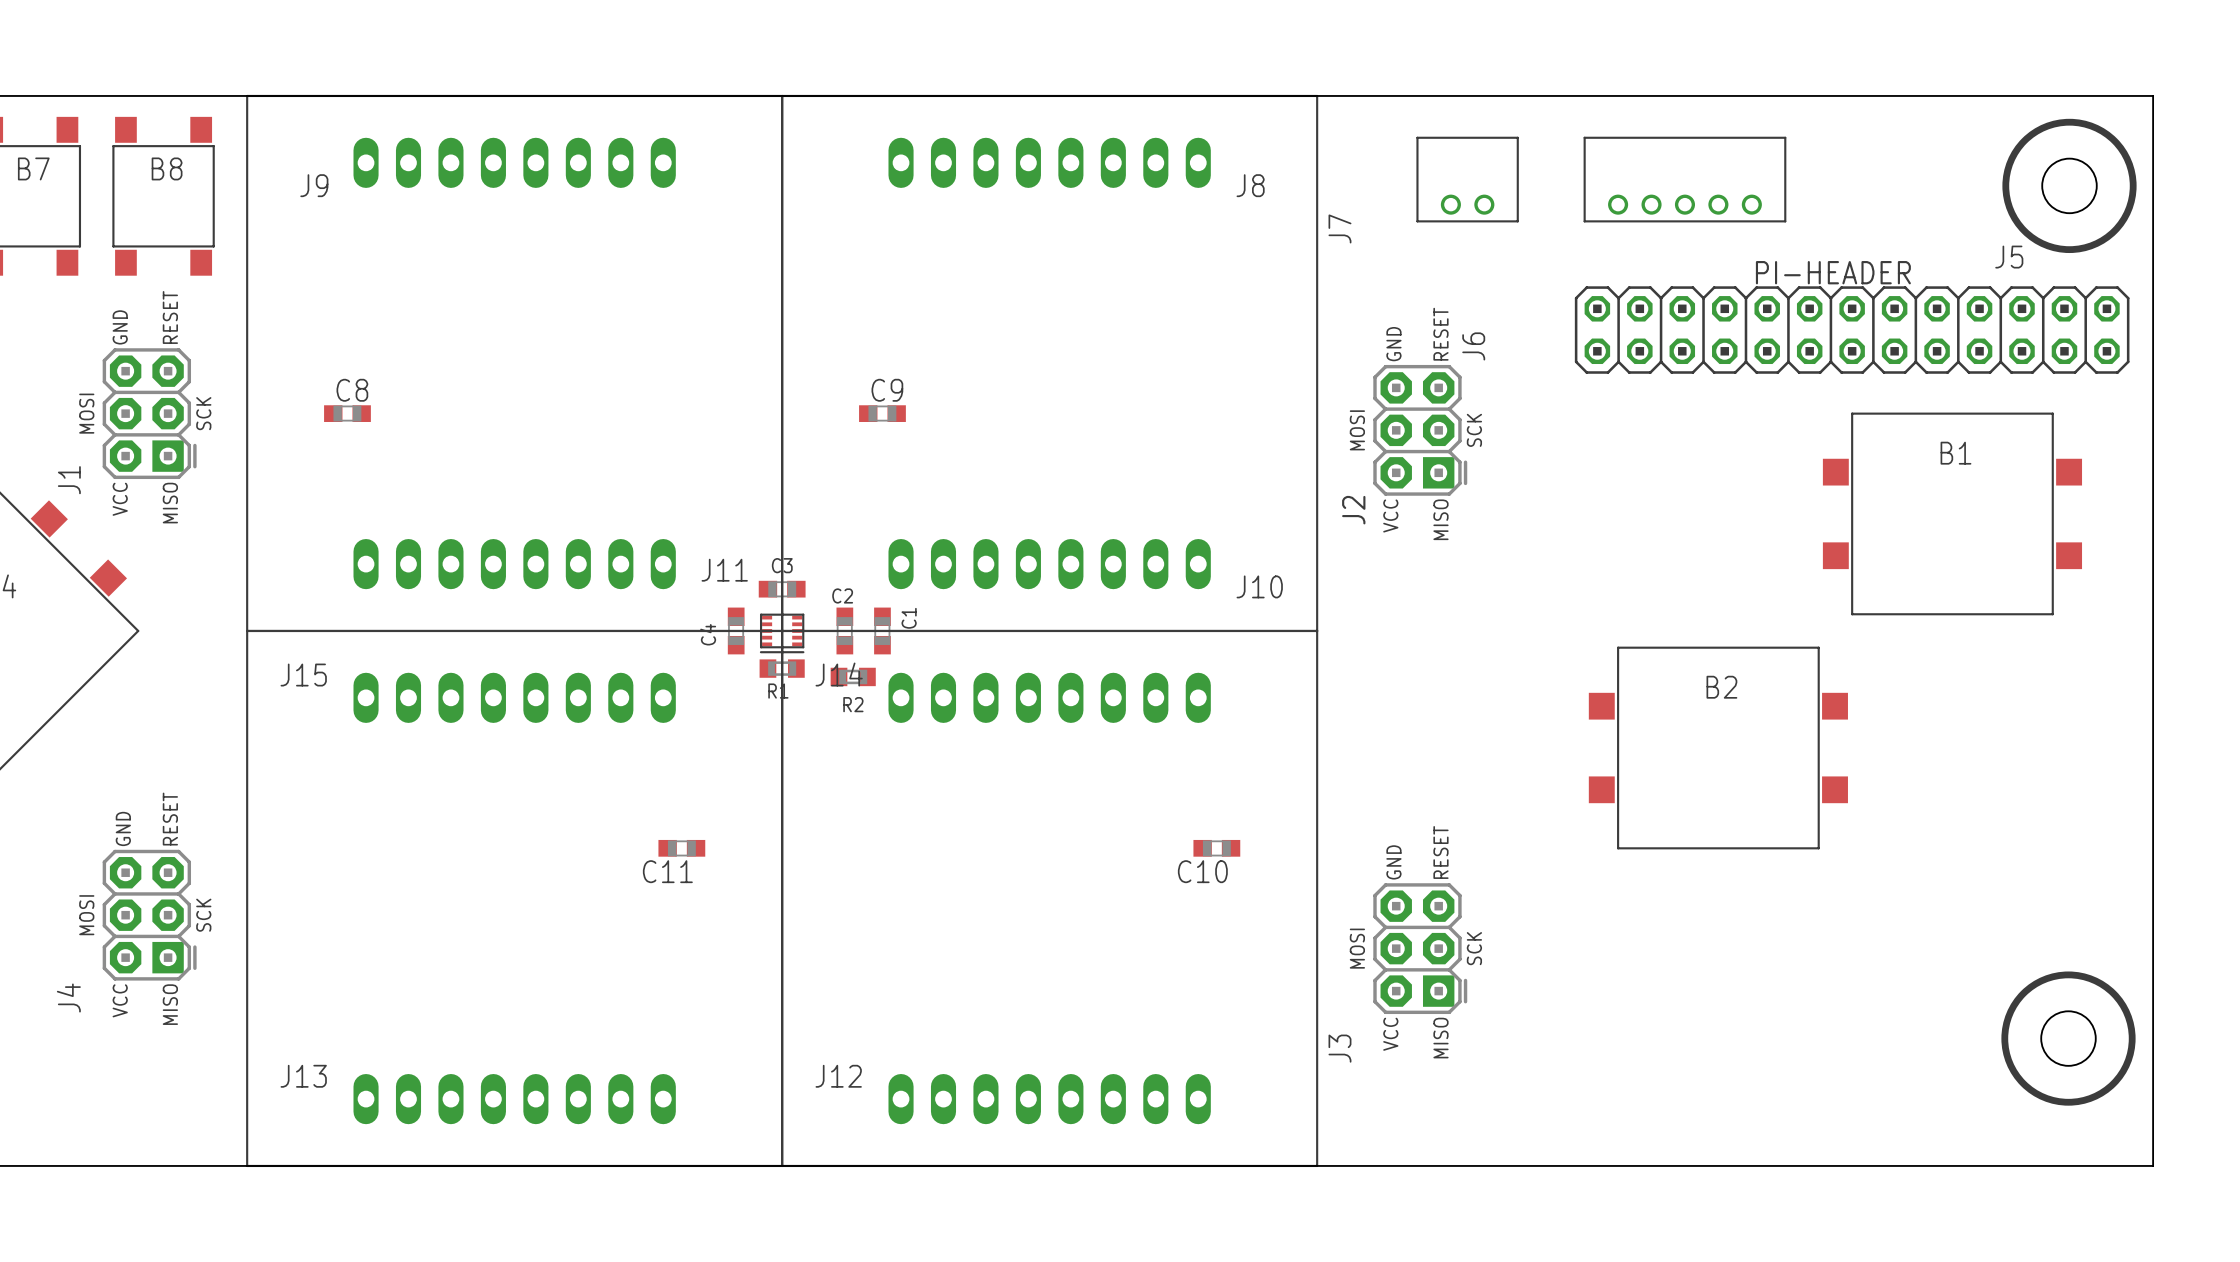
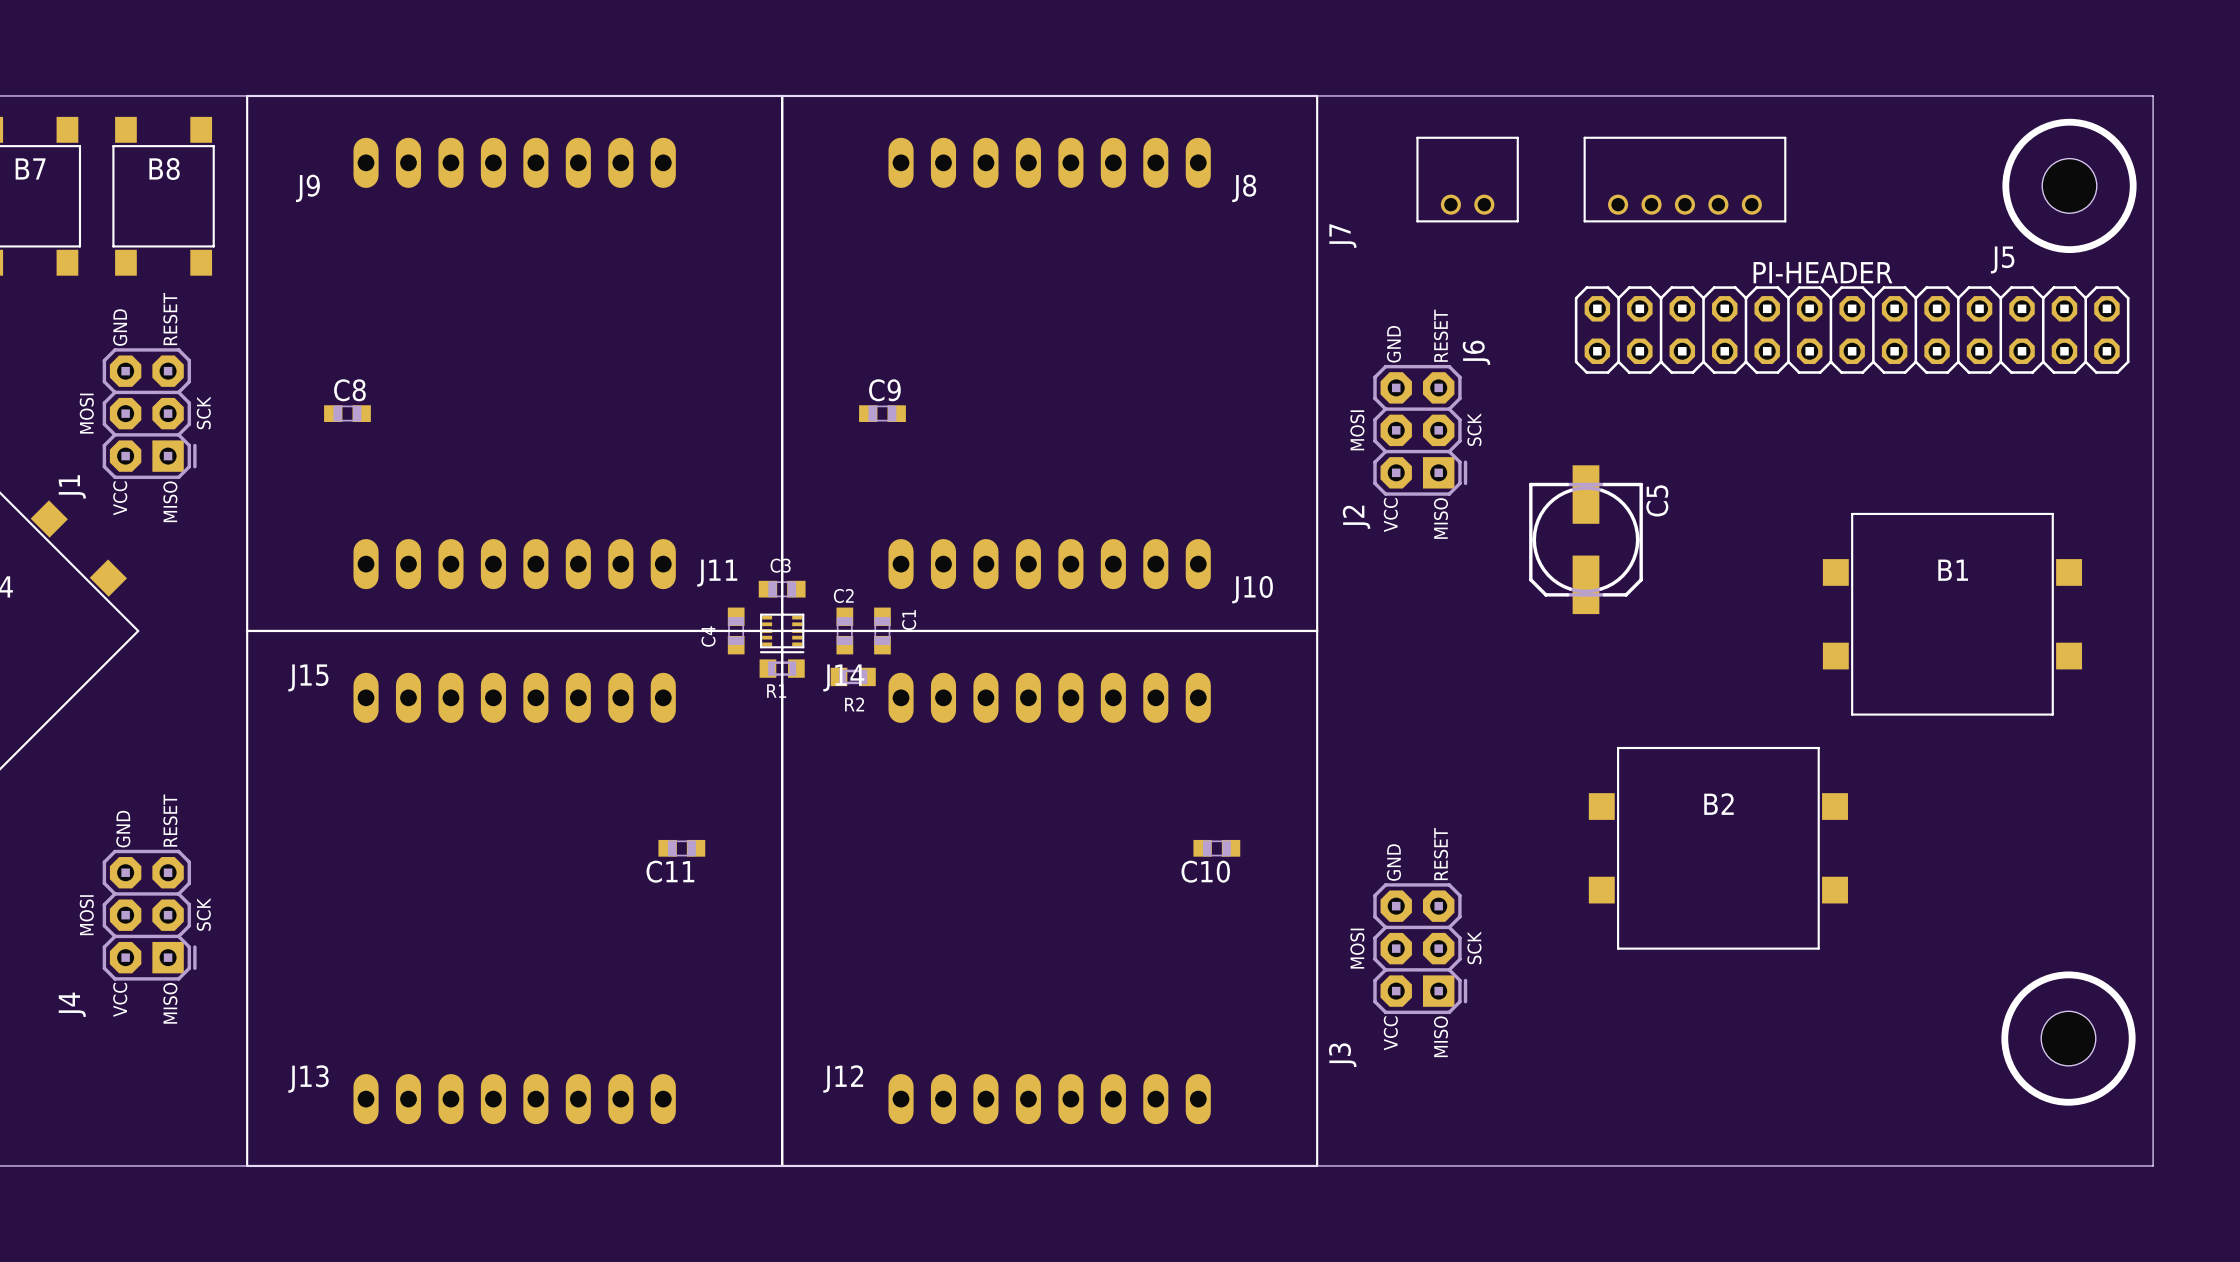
text position: B1 (1955, 453) -> B1 (1953, 570)
part position: (1952, 513) -> (1952, 614)
C5: none -> (1585, 539)
text position: B2 (1721, 687) -> B2 (1718, 804)
part position: (1718, 748) -> (1718, 848)

